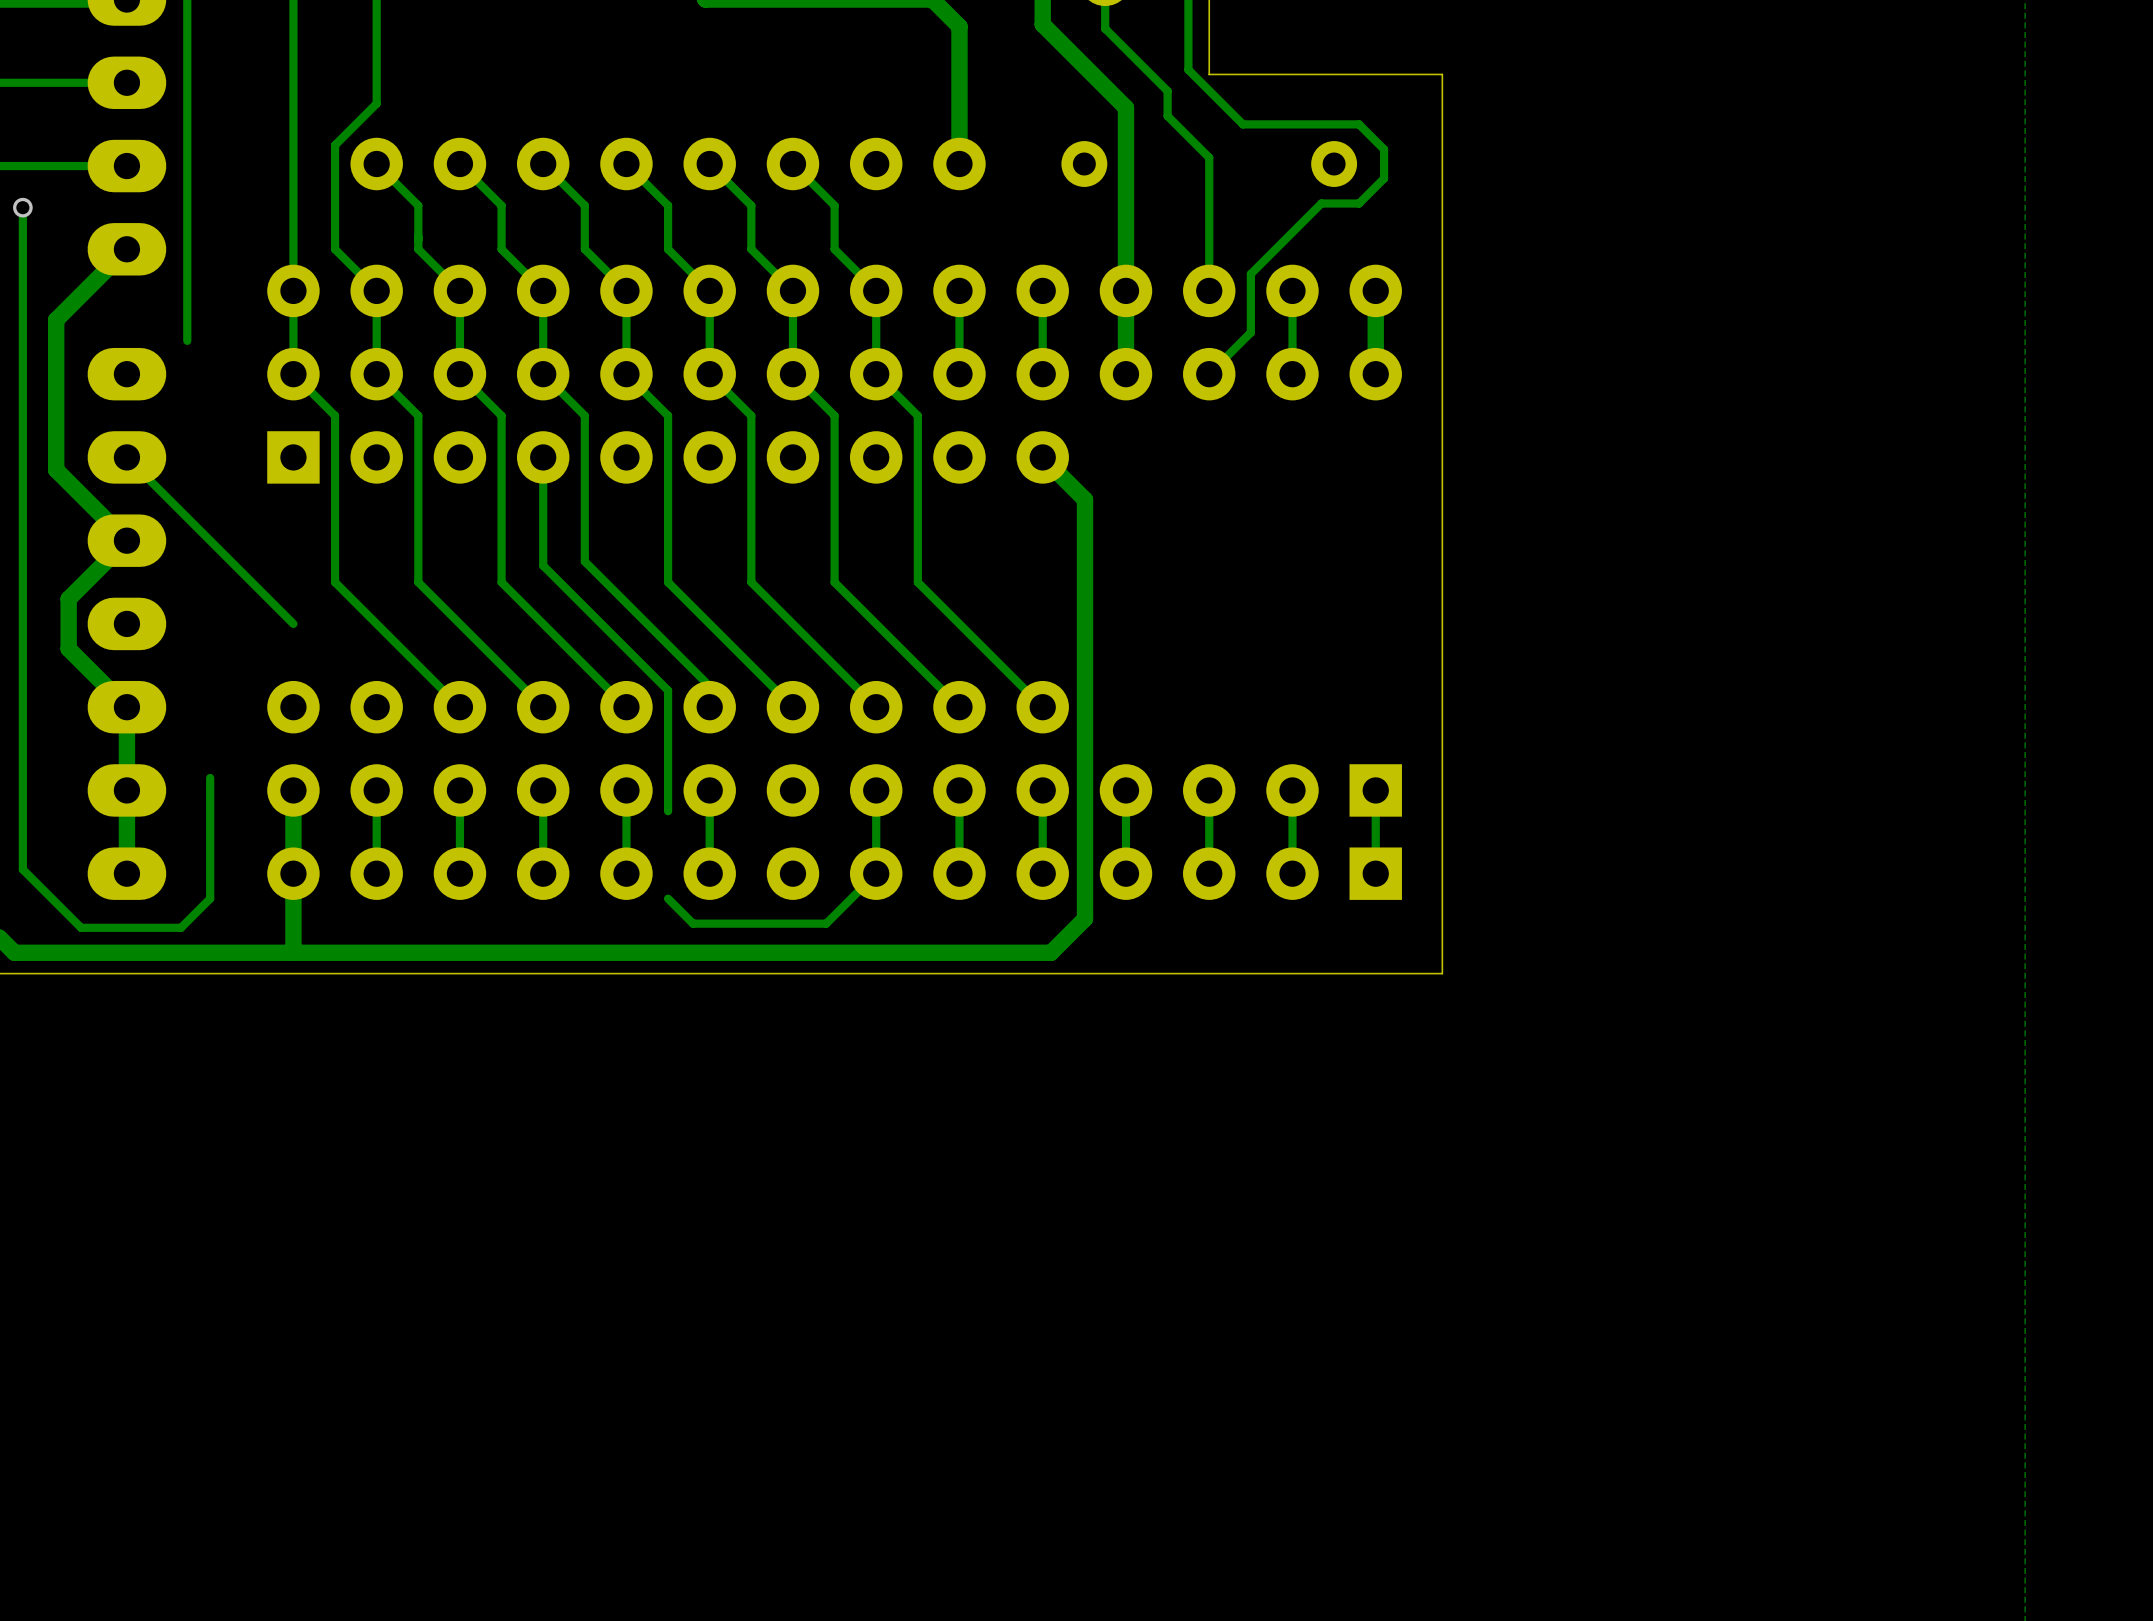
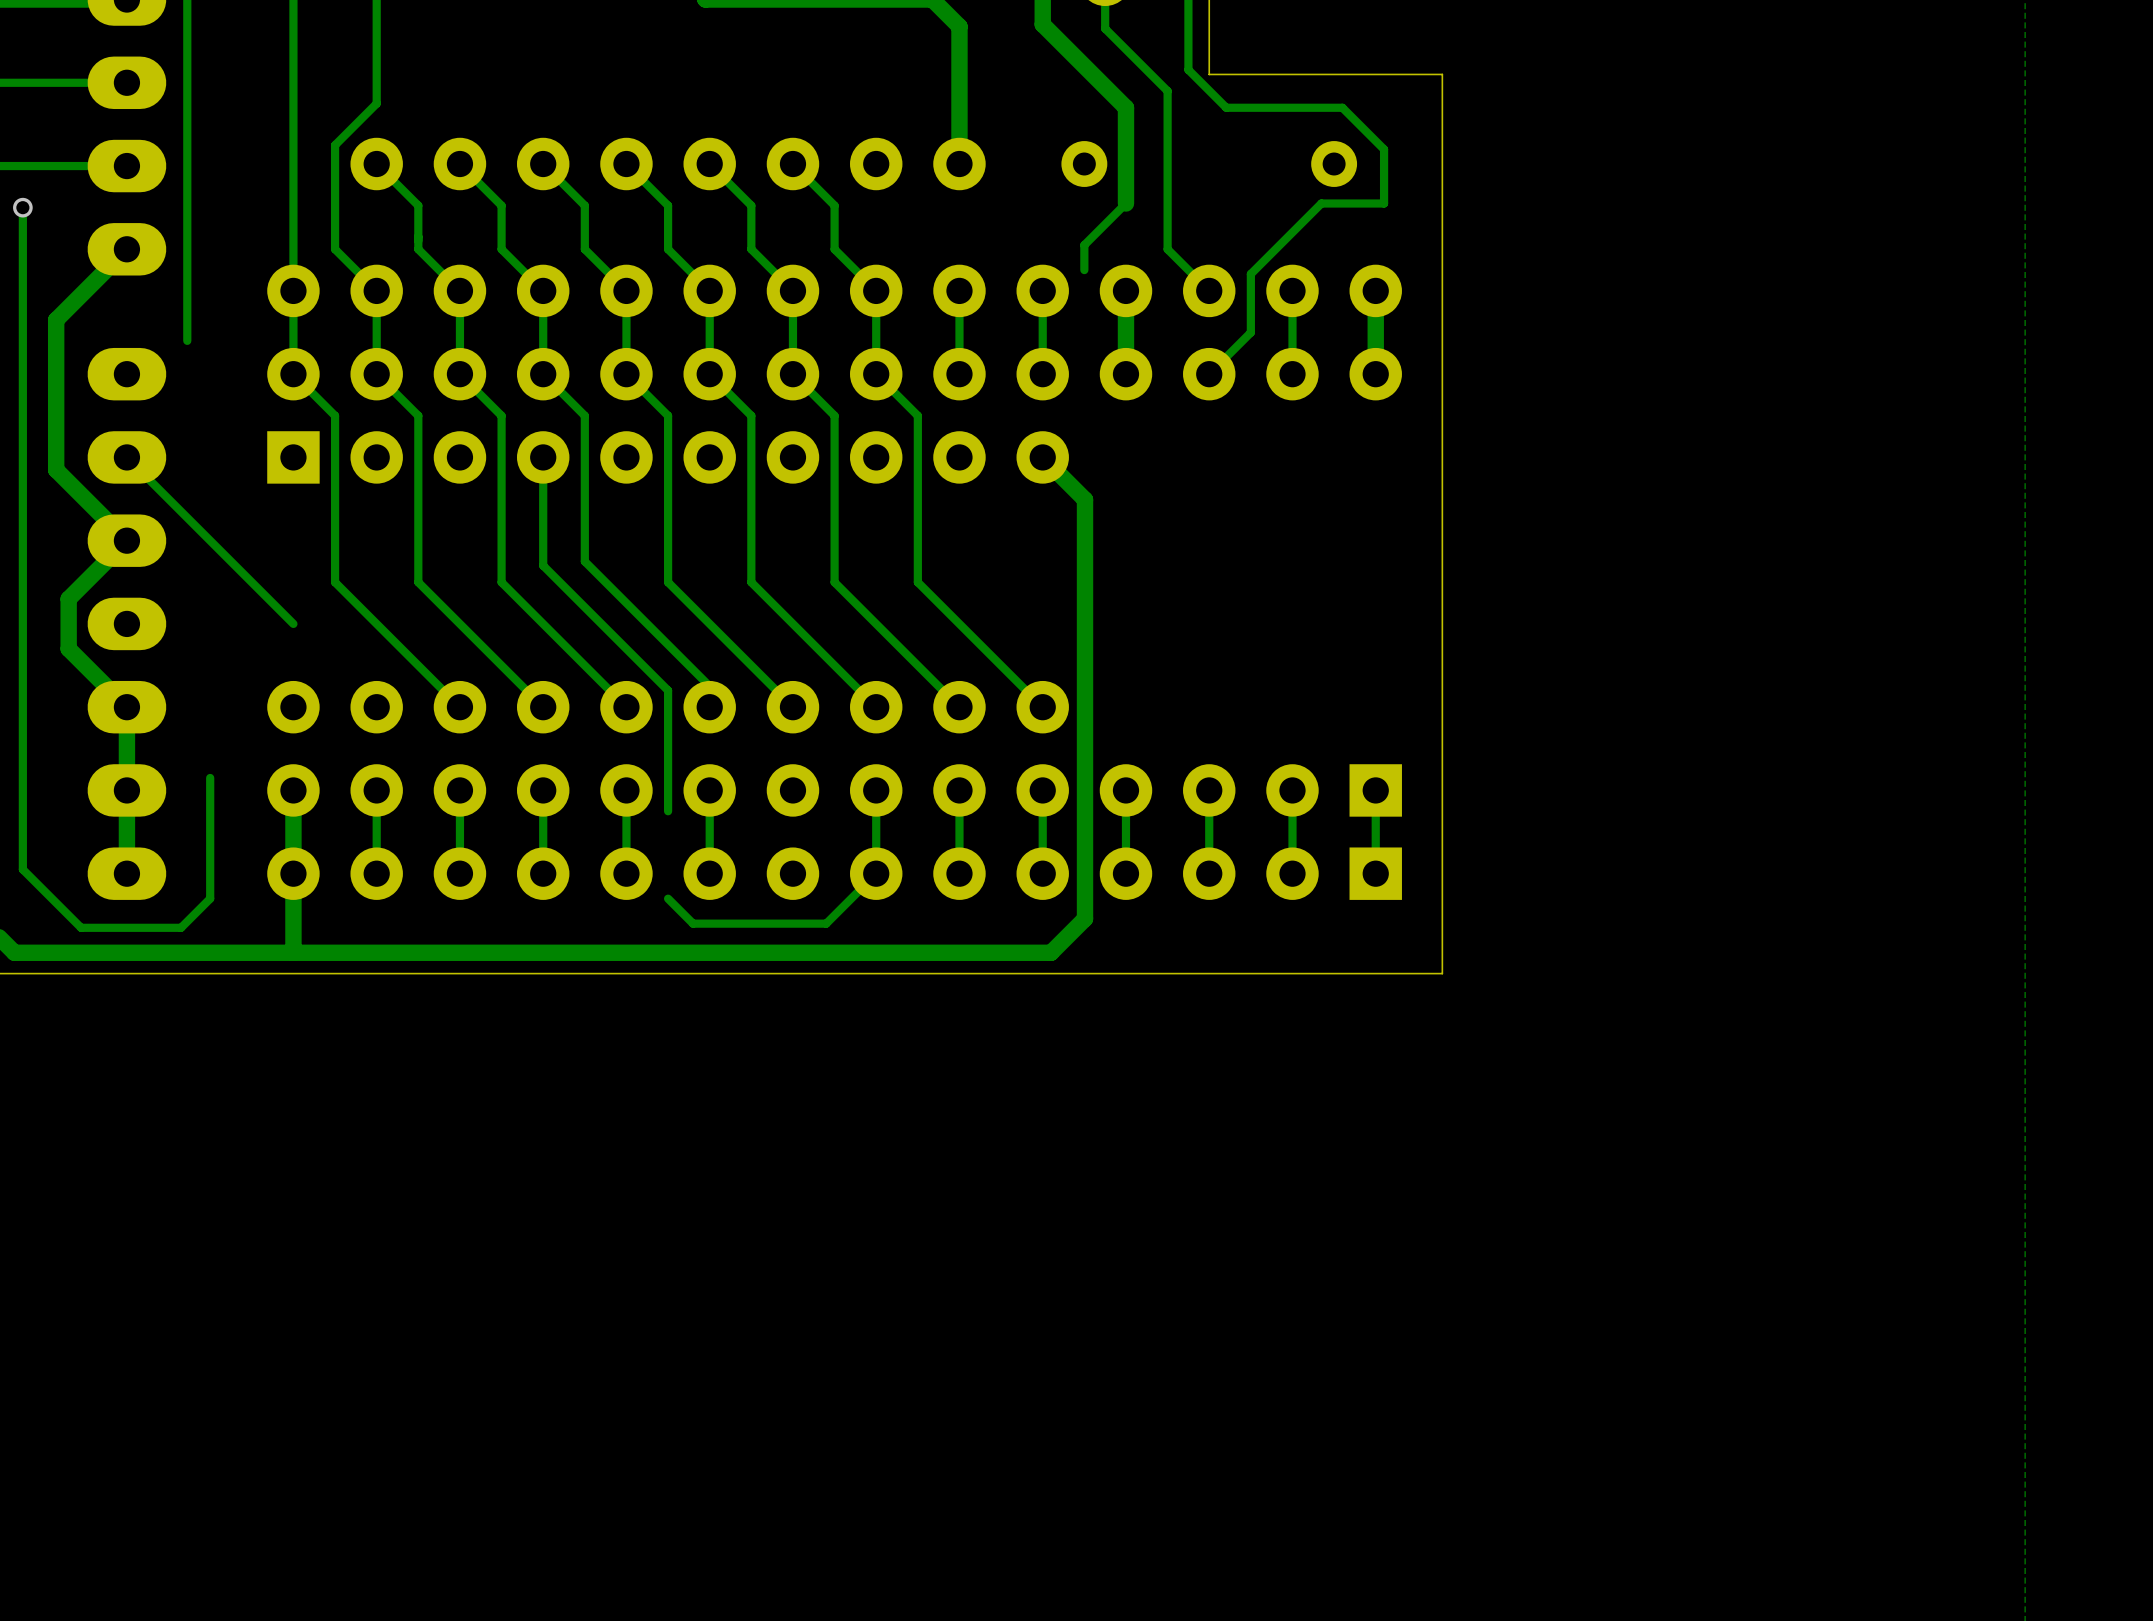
track: (1226, 107) (1242, 124) (1359, 124) -> (1226, 107) (1342, 107) (1359, 124)
track: (1167, 116) (1209, 157) (1209, 290) -> (1167, 116) (1167, 249) (1209, 290)
track: (1384, 178) (1359, 203) -> (1384, 178) (1384, 203) (1359, 203)
track: (1125, 203) (1125, 290) -> (1125, 203) (1084, 245) (1084, 270)

